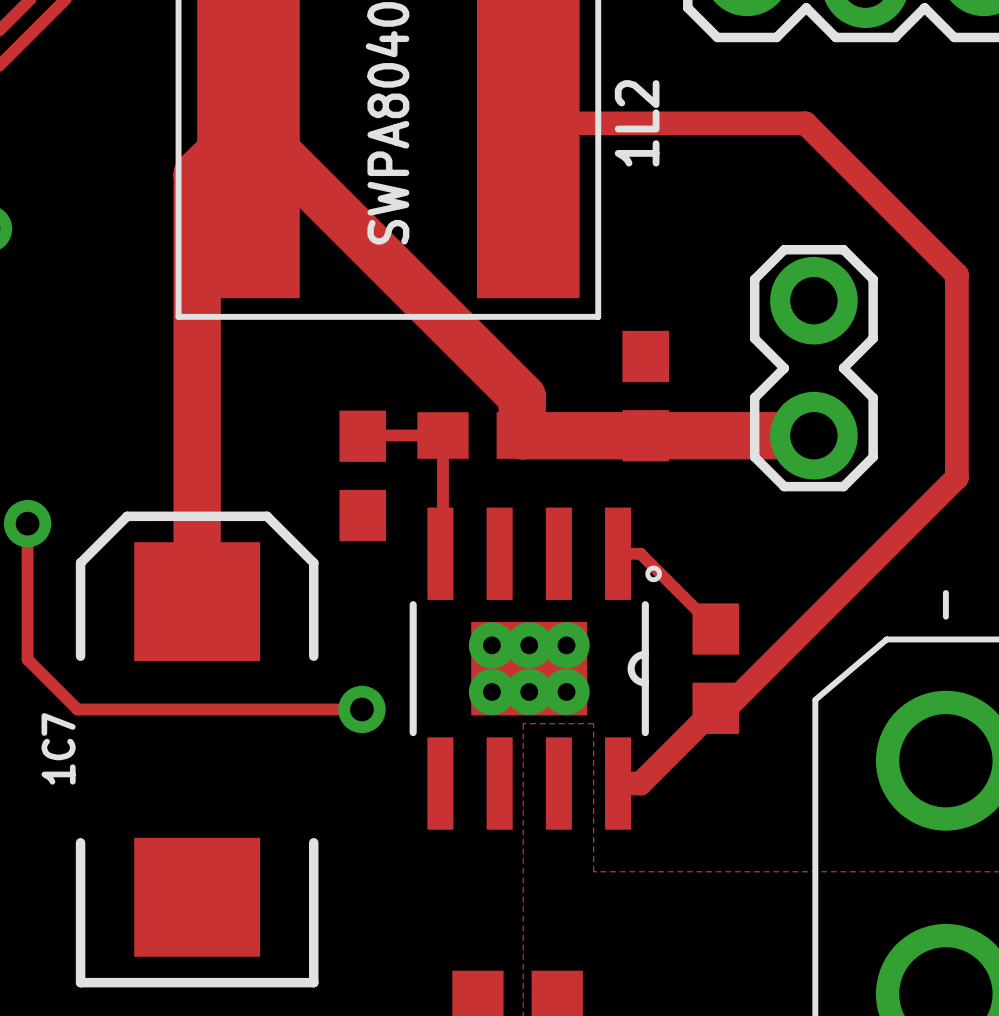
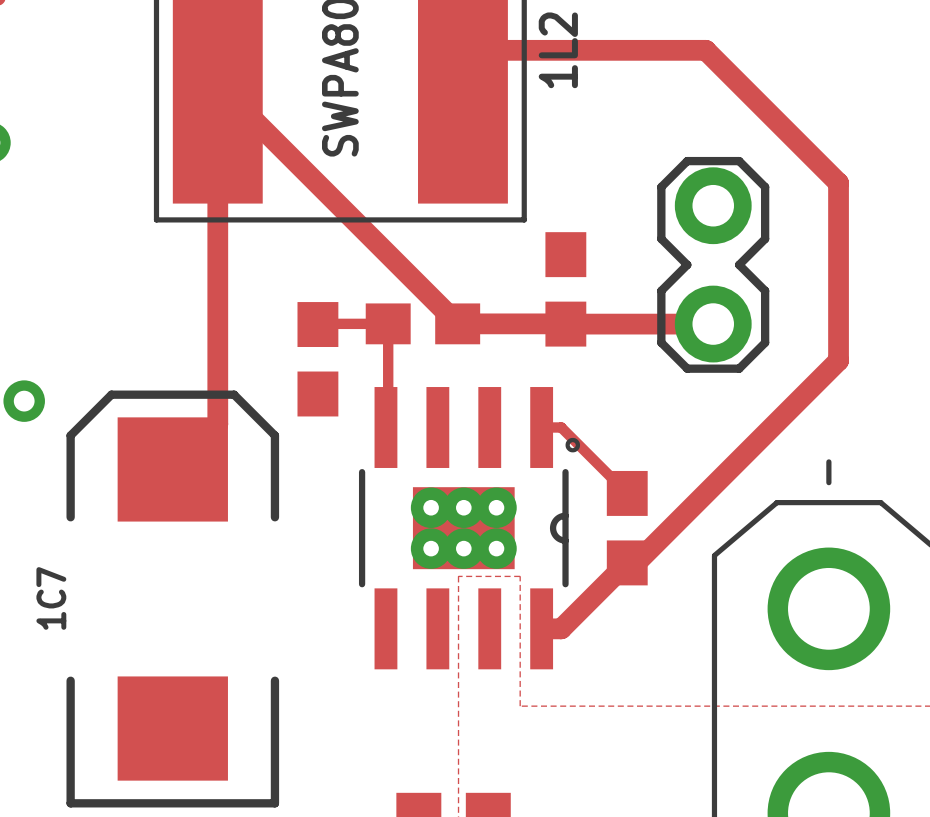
track: (522, 435) (813, 435) -> (217, 83) (457, 323) (713, 324)
track: (522, 435) (522, 397) (248, 123) (197, 174) (197, 601) -> (232, 50) (217, 50) (217, 424) (172, 469)
track: (27, 523) (27, 659) (77, 709) (361, 709) -> none
via: (361, 709) -> none

